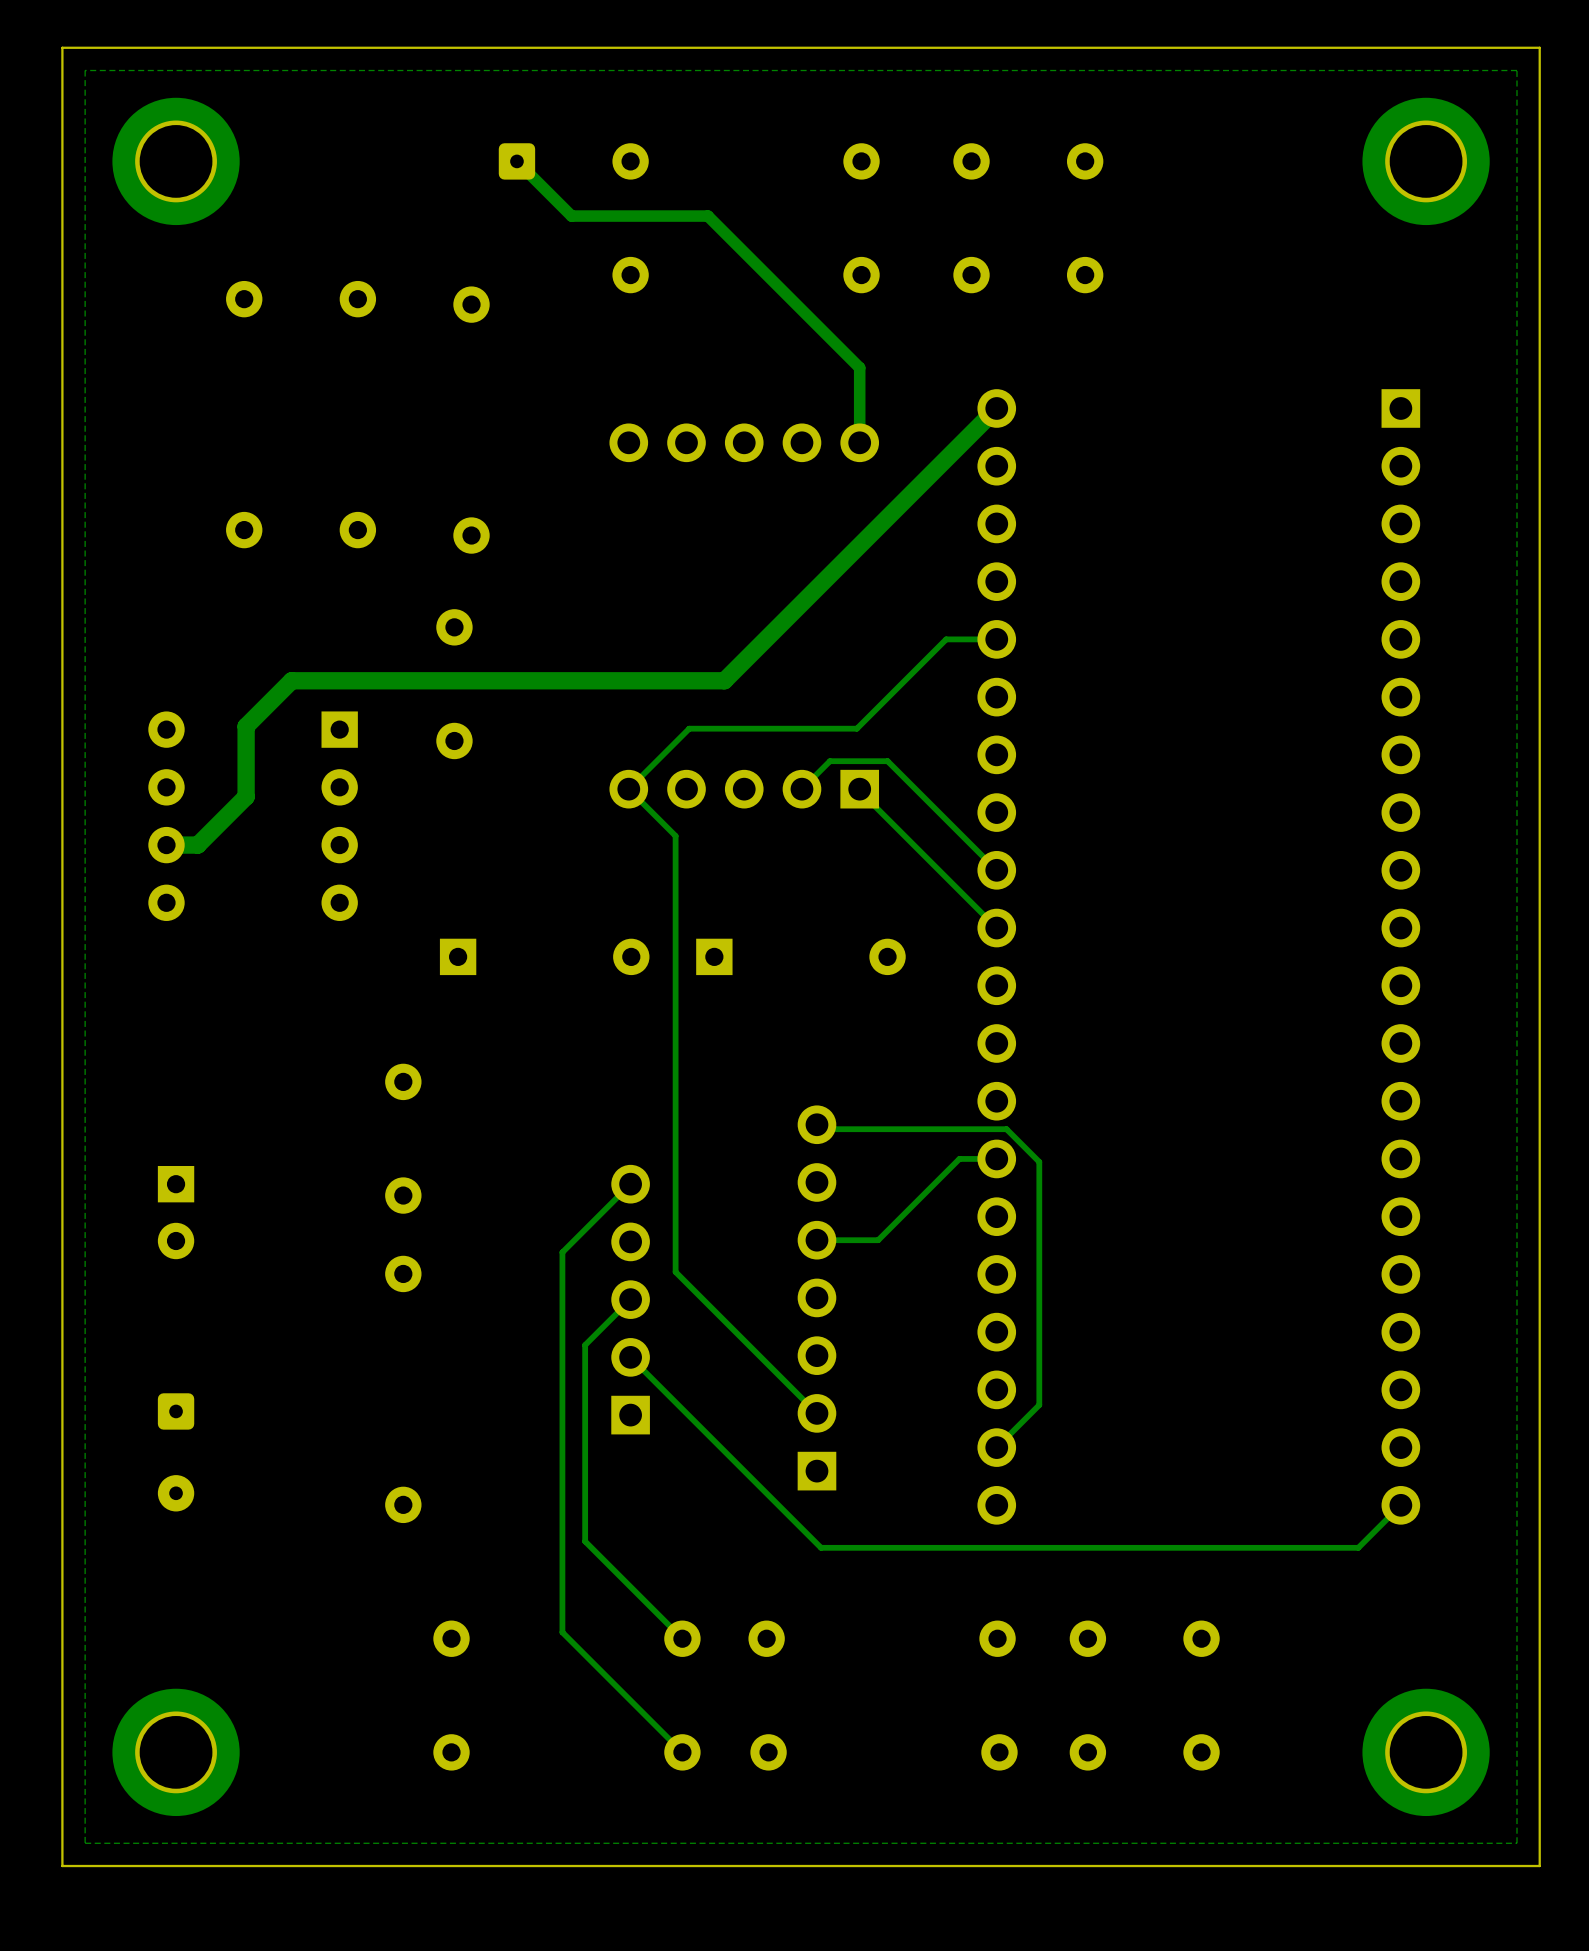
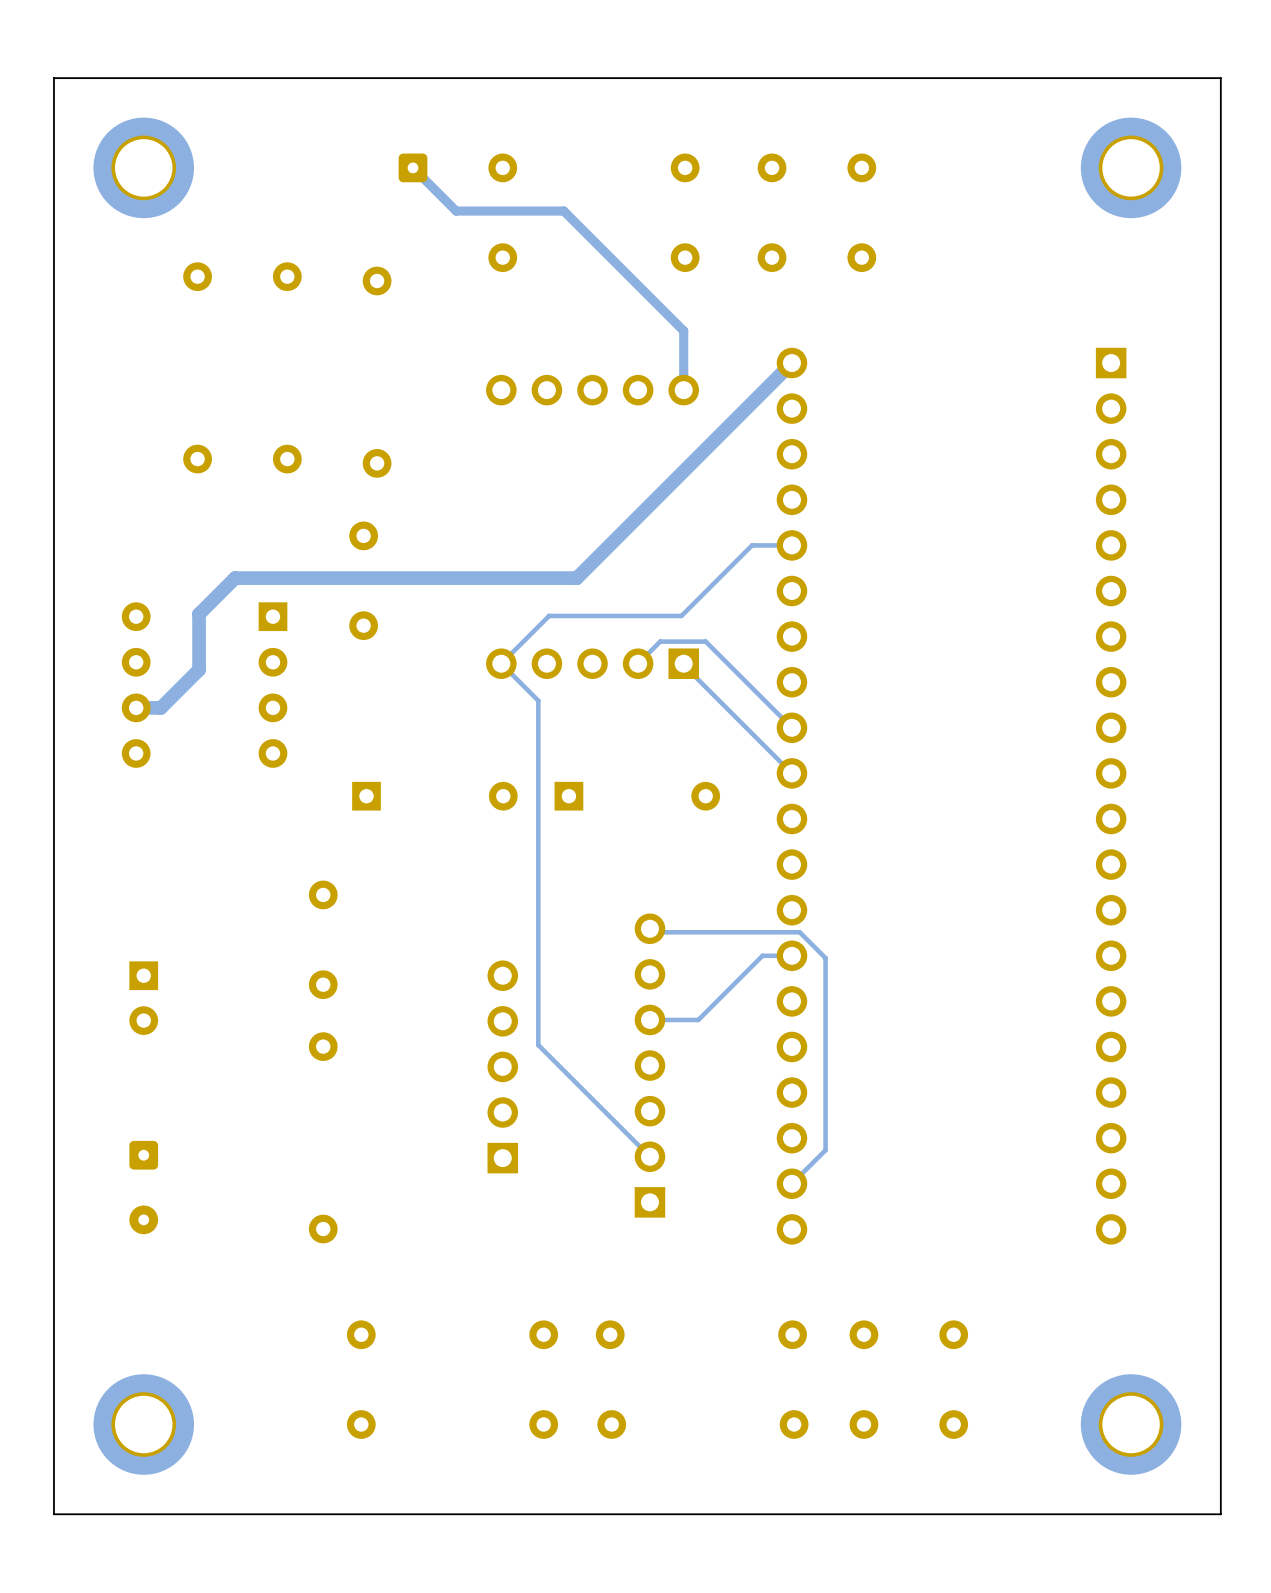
zone outline: (1516, 70) (1516, 1843) (85, 1843) (85, 70) (1516, 70) -> none
track: (630, 1184) (562, 1252) (562, 1632) (682, 1752) -> none
track: (630, 1299) (585, 1345) (585, 1541) (682, 1638) -> none
track: (630, 1357) (821, 1547) (1358, 1547) (1400, 1505) -> none

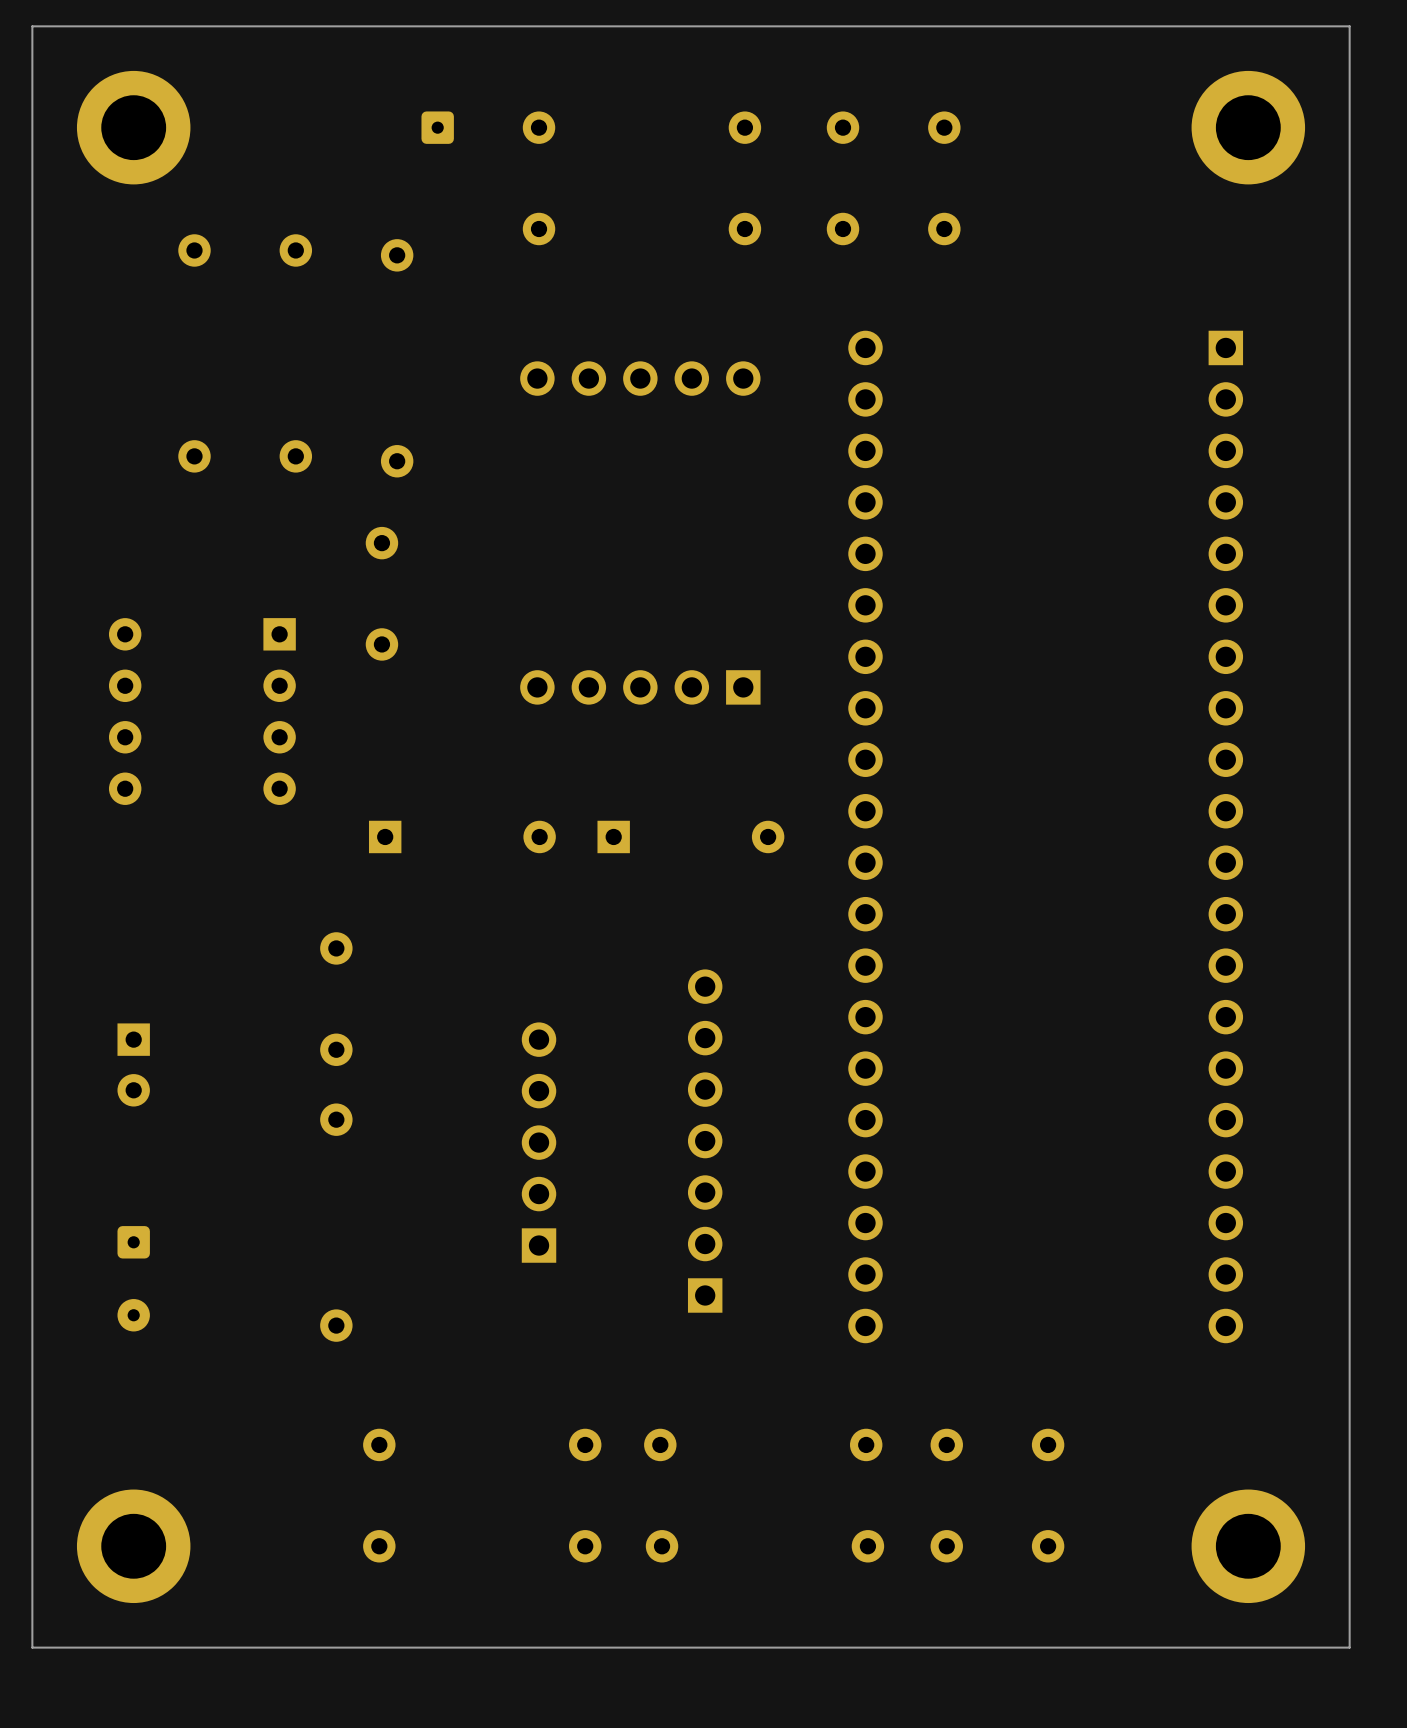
track: (413, 167) (456, 211) (563, 211) (683, 330) (683, 390) -> none
track: (791, 363) (576, 578) (235, 578) (199, 614) (199, 669) (160, 707) (136, 707) -> none
track: (791, 545) (752, 545) (681, 615) (549, 615) (501, 663) (538, 700) (538, 1045) (649, 1156) -> none
track: (638, 663) (660, 641) (705, 641) (791, 727) -> none
track: (683, 663) (791, 773) -> none
track: (649, 928) (653, 932) (799, 932) (825, 958) (825, 1150) (791, 1183) -> none
track: (791, 955) (762, 955) (698, 1019) (649, 1019) -> none

